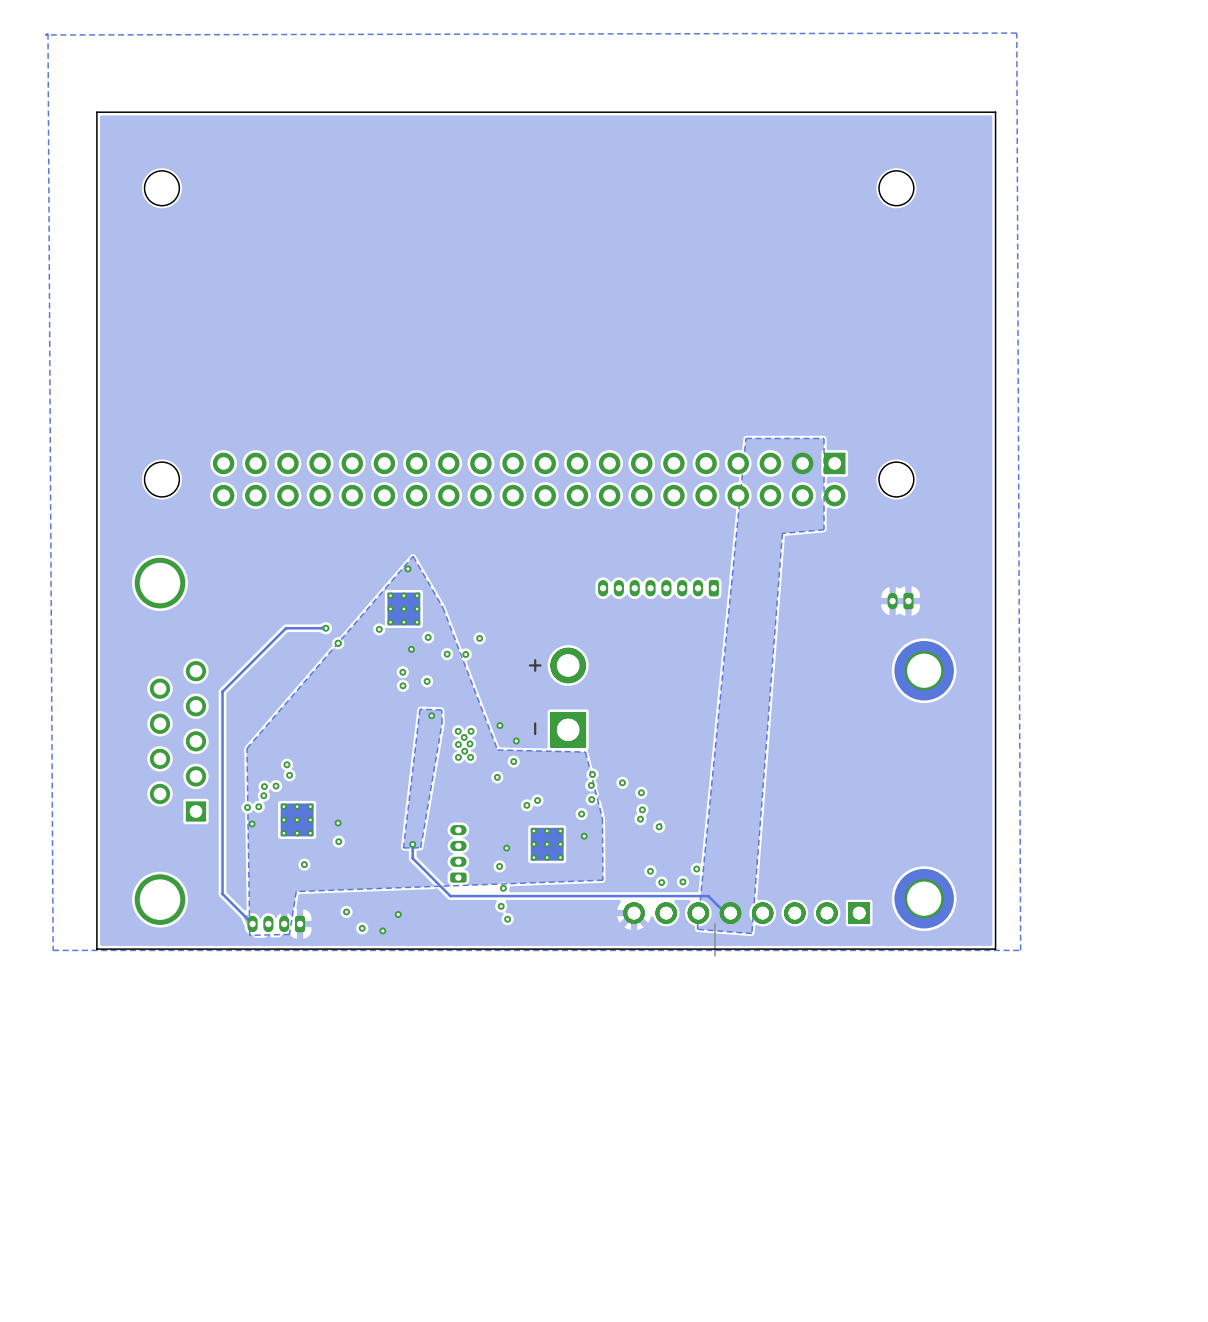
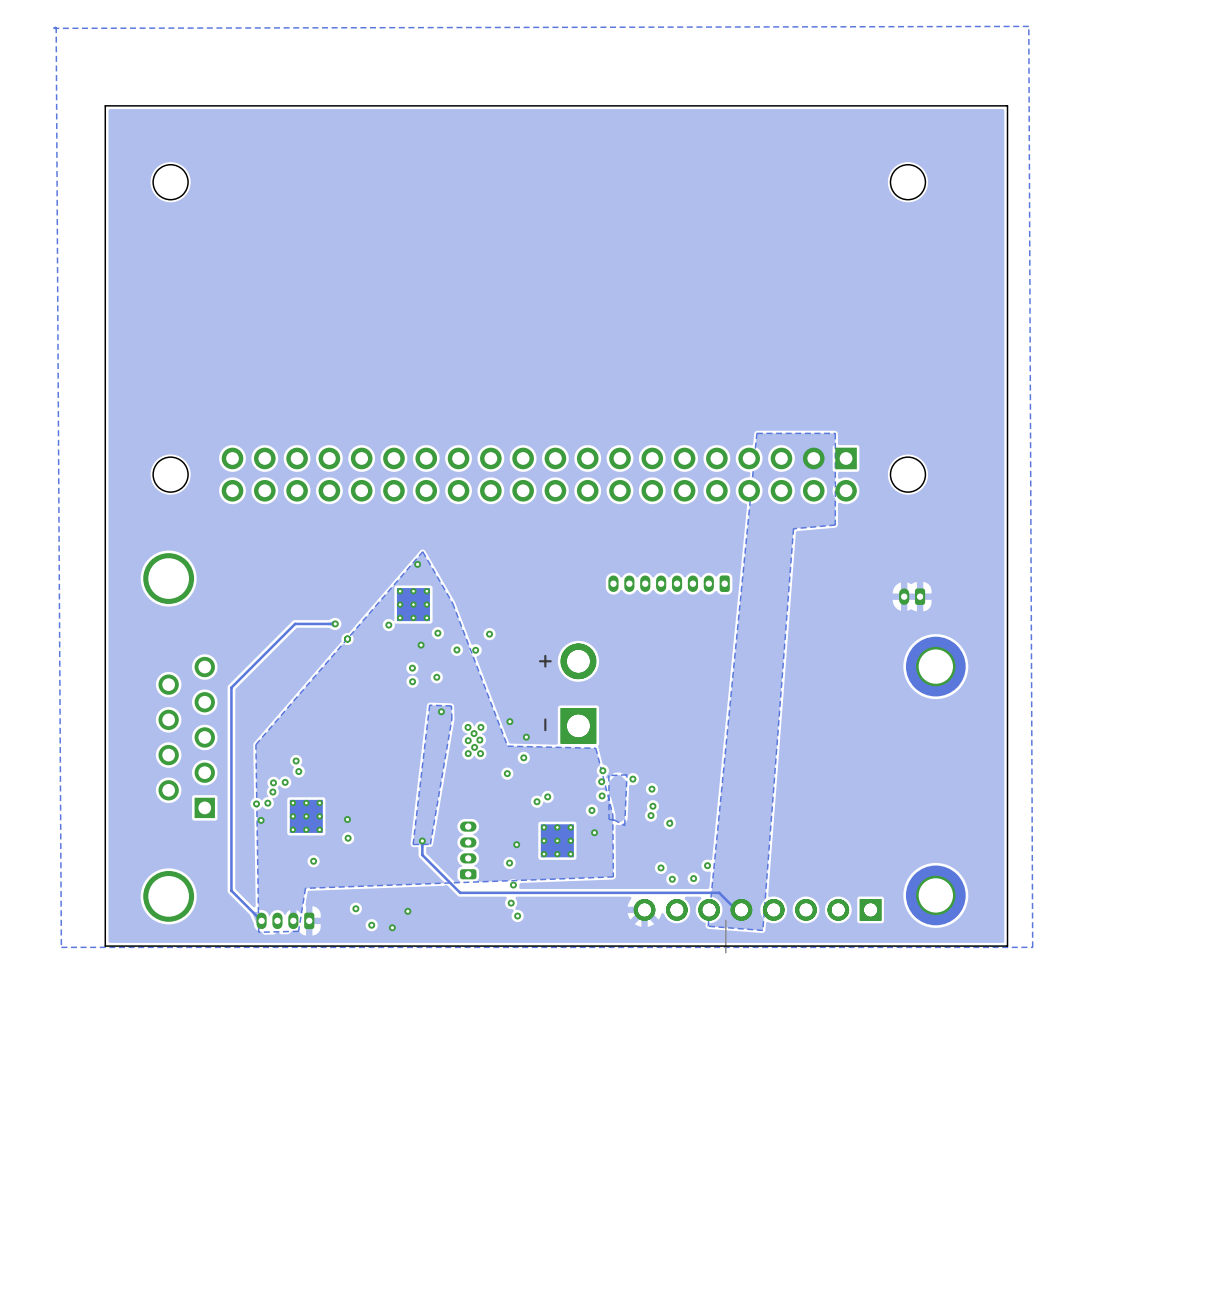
zone outline: none -> (626, 774) (608, 775) (609, 819) (624, 825) (626, 774)

